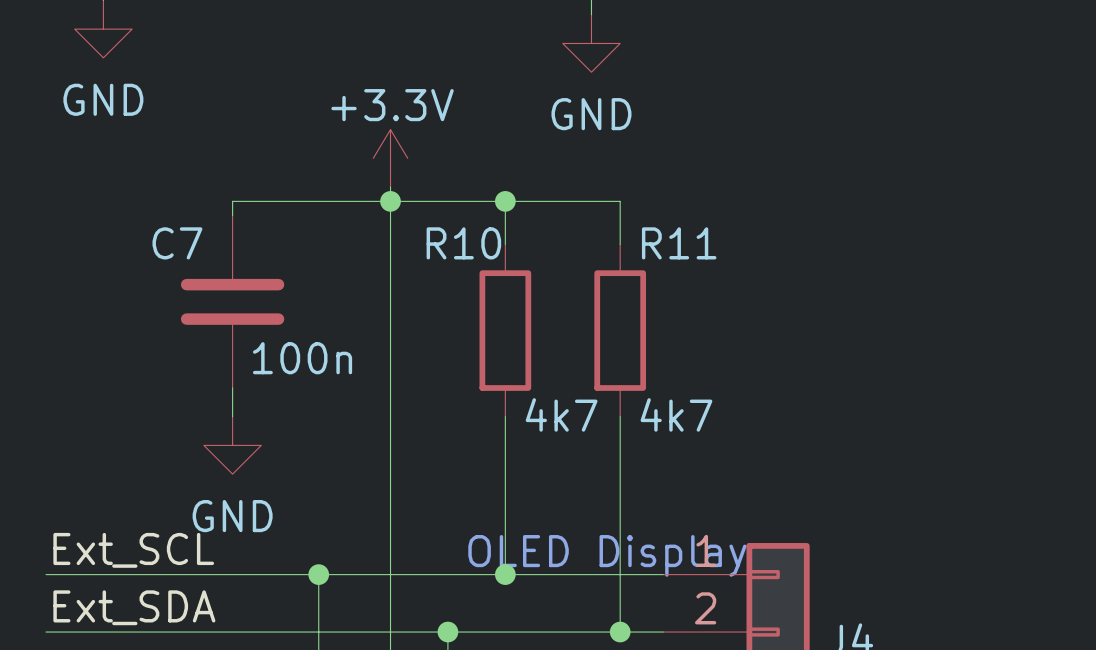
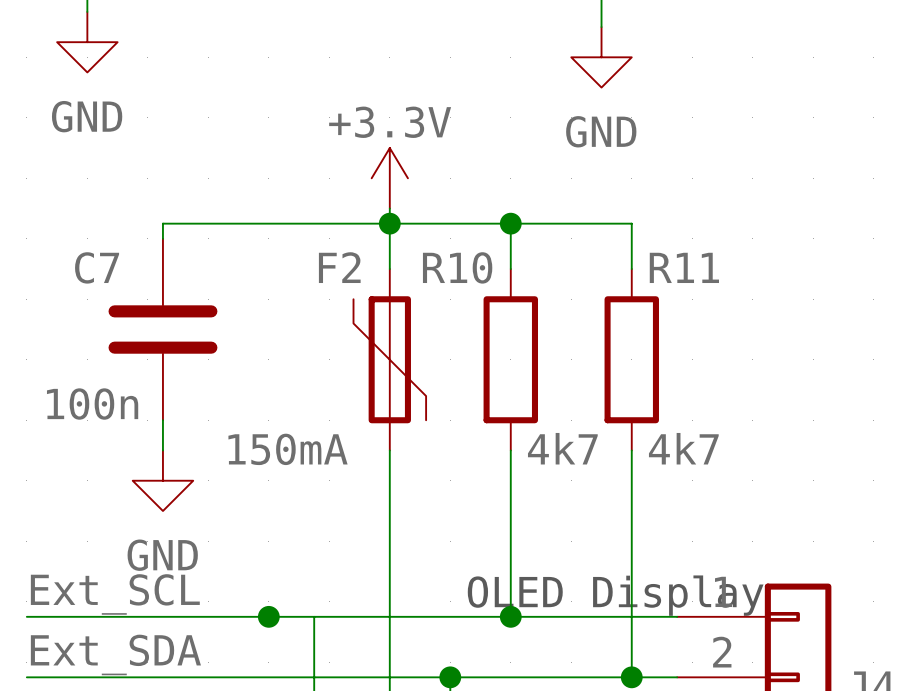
wire: (232, 201) (232, 215) -> (223, 223) (162, 223) (162, 238)
C7 position: (232, 301) -> (162, 329)
F2: none -> 150mA (389, 359)
C7 value position: 100n (302, 358) -> 100n (92, 404)
wire: (232, 387) (232, 416) -> (162, 420) (162, 450)
power symbol position: GND (232, 445) -> GND (162, 480)
junction position: (318, 574) -> (268, 616)

